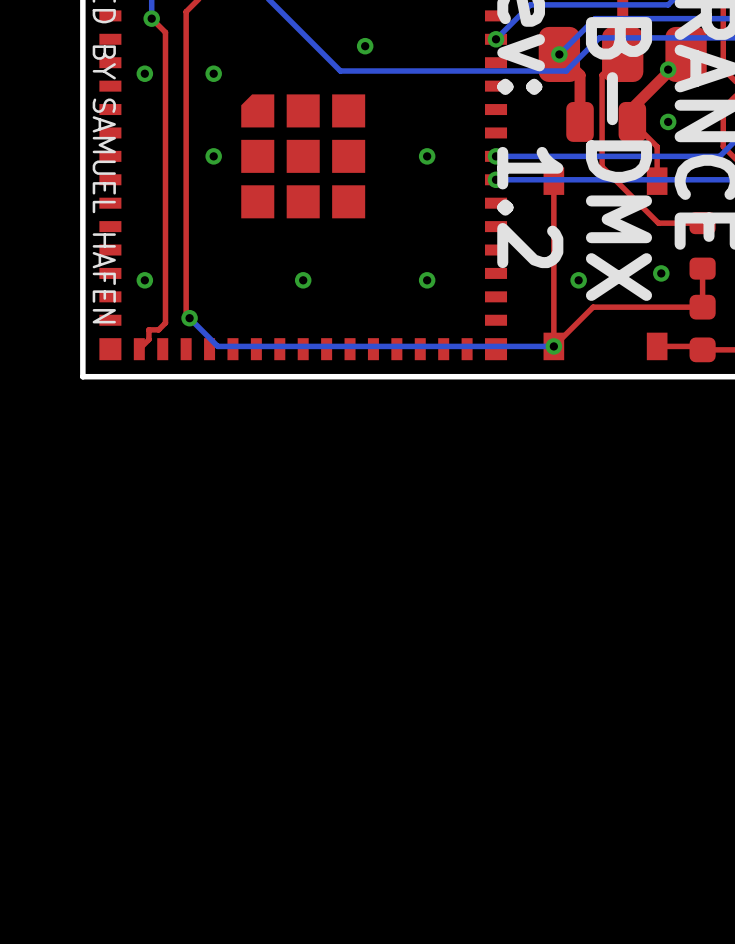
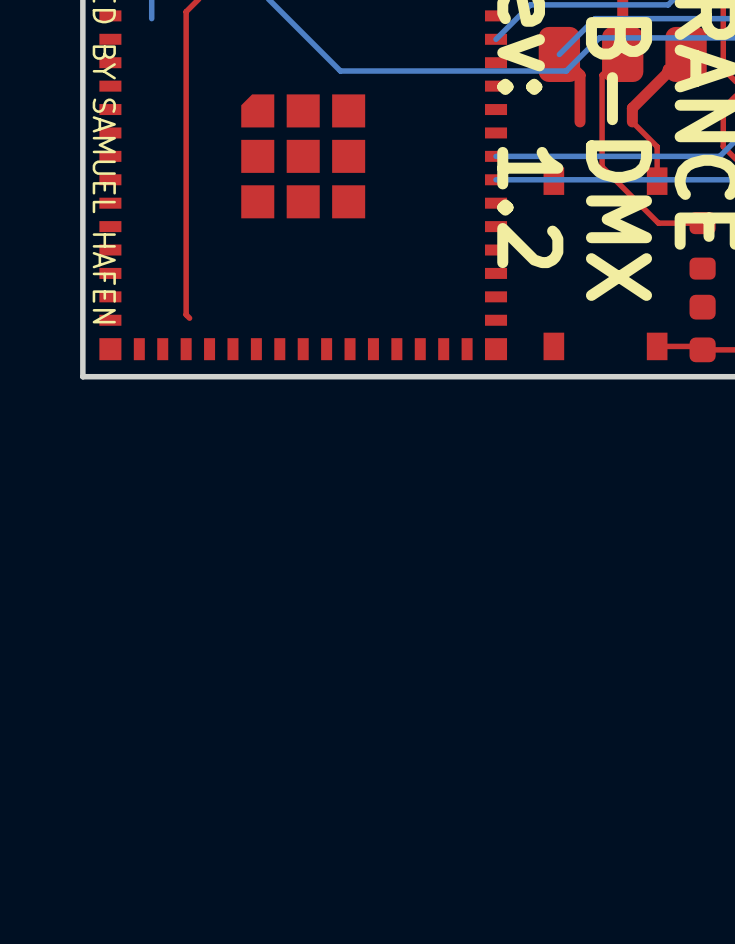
top track: (151, 18) (165, 32) (165, 323) (158, 329) (148, 329) (148, 339) (139, 349) -> none
via: (151, 18) -> none
via: (496, 39) -> none
via: (365, 46) -> none
via: (559, 54) -> none
via: (668, 69) -> none
via: (144, 73) -> none
via: (213, 73) -> none
part: (606, 121) -> none
via: (668, 121) -> none
via: (213, 156) -> none
via: (427, 156) -> none
via: (496, 156) -> none
via: (496, 179) -> none
top track: (553, 181) (553, 346) (593, 307) (702, 307) (702, 268) -> none
via: (661, 273) -> none
via: (144, 280) -> none
via: (303, 280) -> none
via: (427, 280) -> none
via: (578, 280) -> none
bottom track: (189, 318) (217, 346) (553, 346) -> none
via: (189, 318) -> none
via: (553, 346) -> none

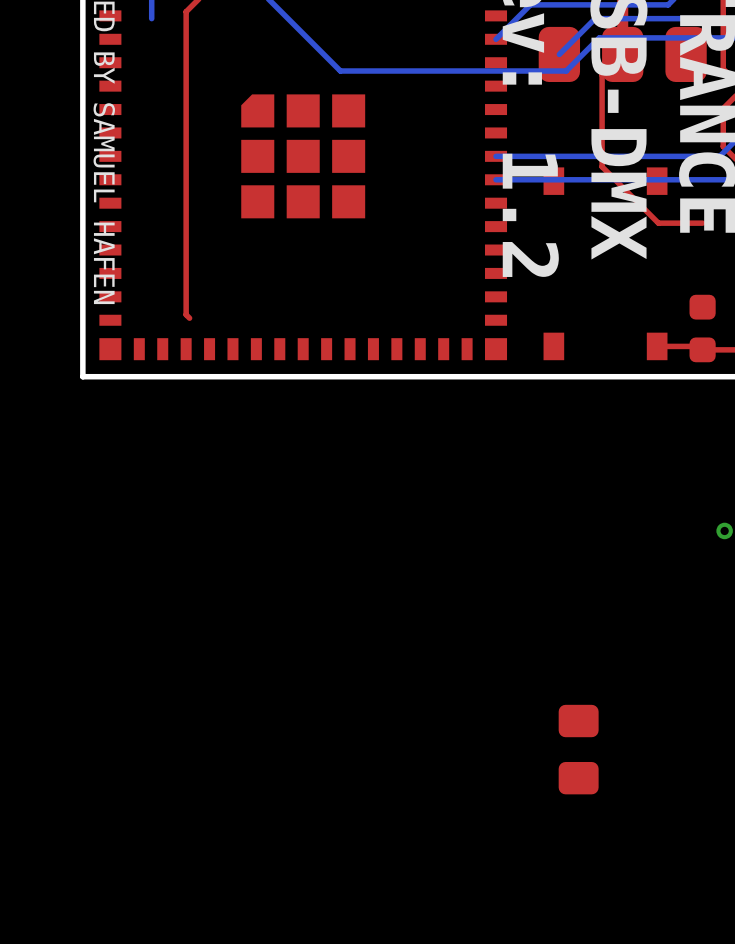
top track: (559, 54) (580, 75) (580, 121) -> none
top track: (686, 61) (686, 54) (670, 69) (668, 69) (668, 72) (632, 108) (632, 121) (657, 146) (657, 181) -> none
part: (702, 245) -> none
via: none -> (724, 530)
part: none -> (578, 749)

